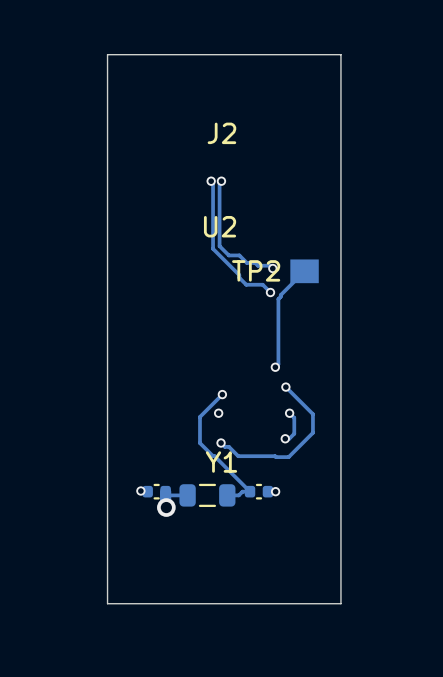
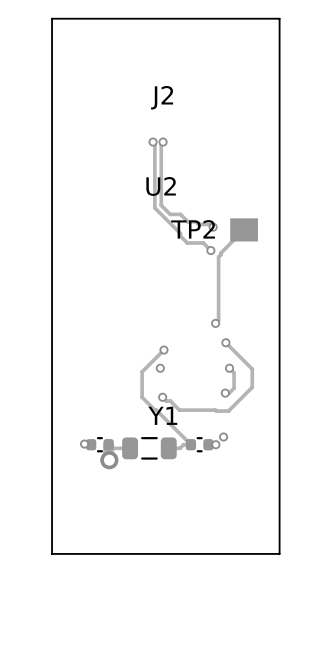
via: none -> (223, 436)

